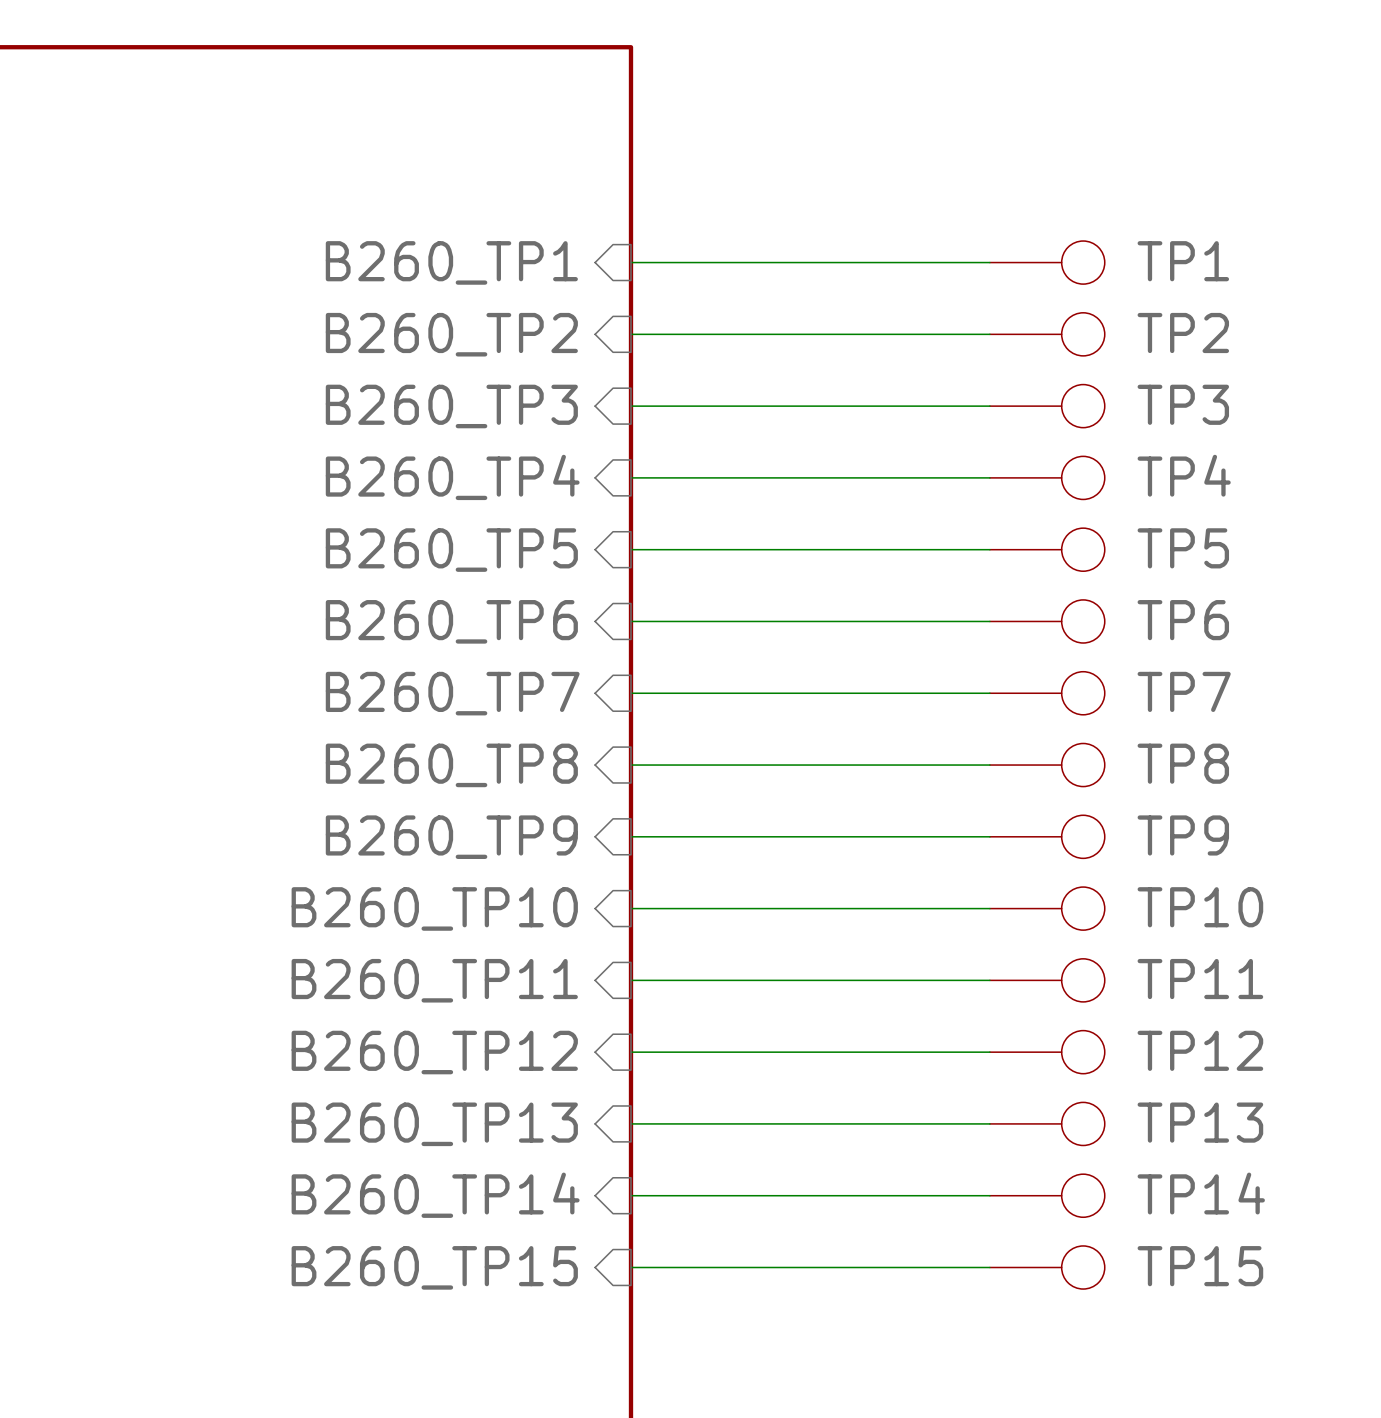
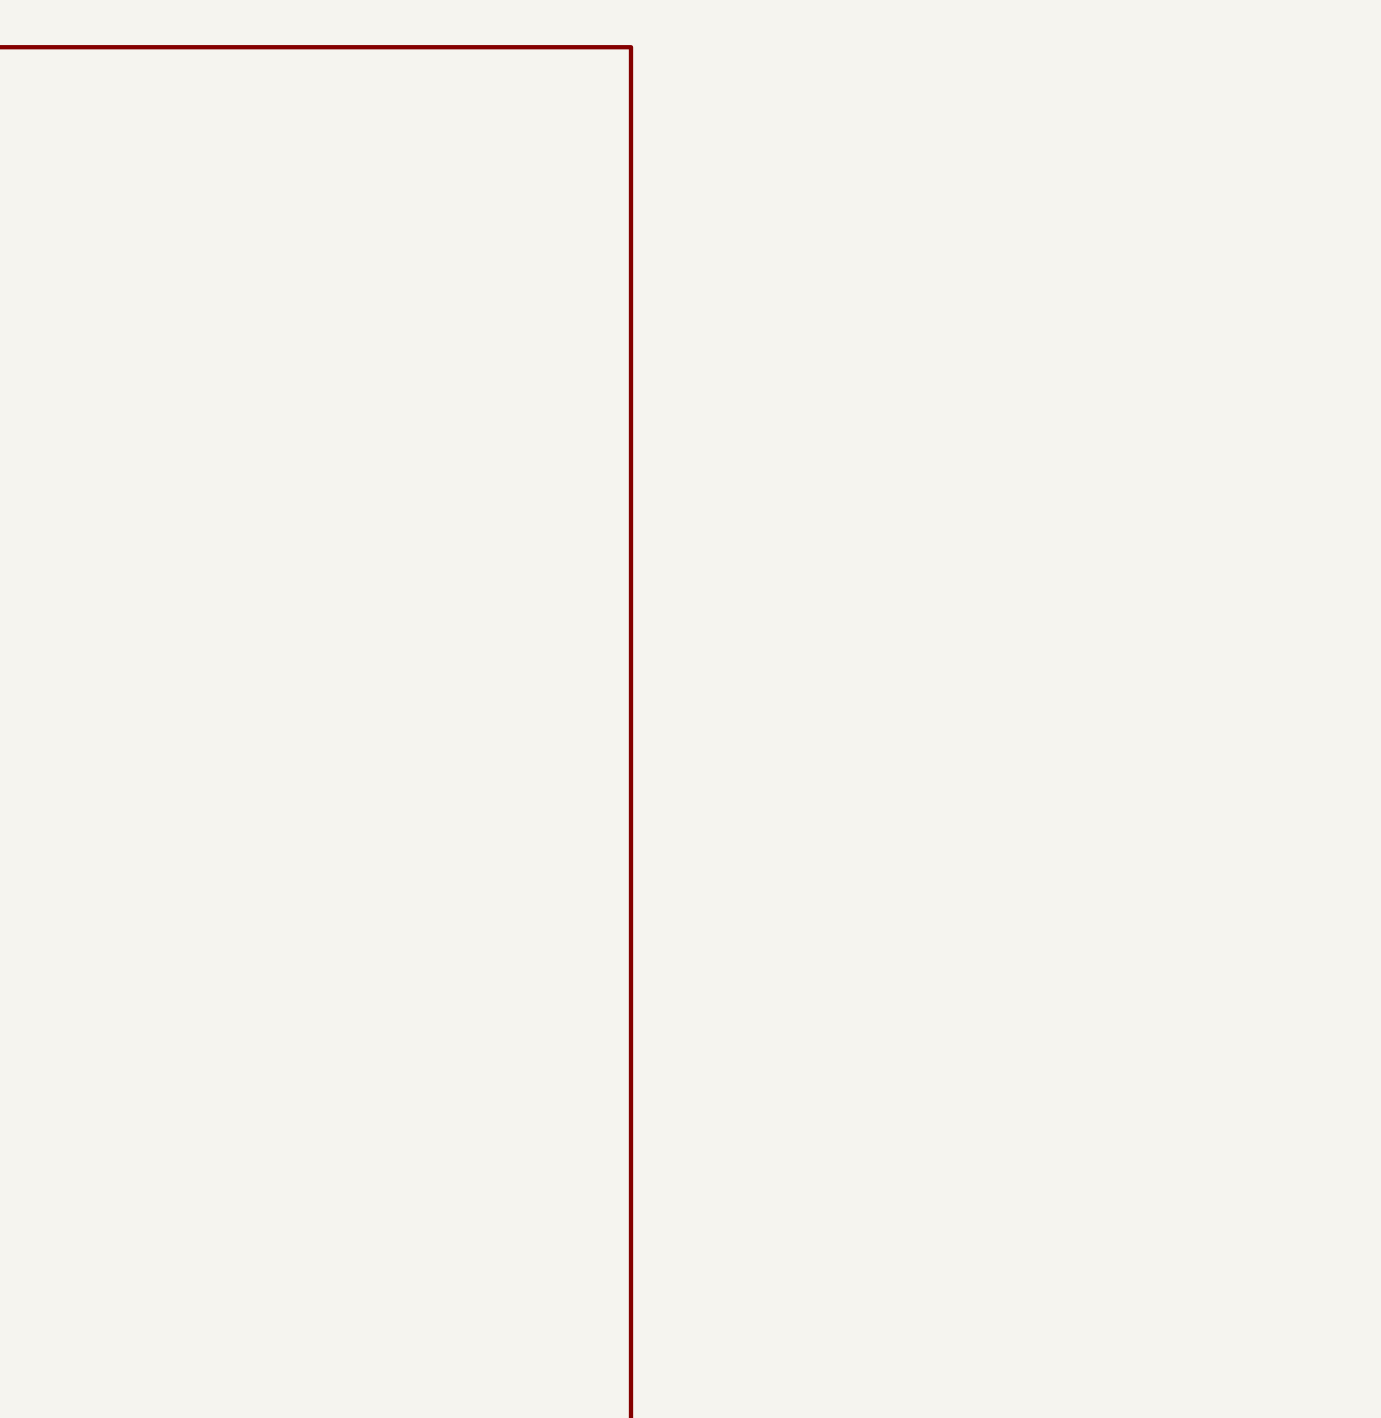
sheet pin: B260_TP1 (451, 262) -> none
wire: (630, 262) (989, 262) -> none
TP1: (1047, 262) -> none
sheet pin: B260_TP2 (451, 334) -> none
wire: (630, 334) (989, 334) -> none
TP2: (1047, 334) -> none
sheet pin: B260_TP3 (451, 406) -> none
wire: (630, 406) (989, 406) -> none
TP3: (1047, 406) -> none
sheet pin: B260_TP4 (452, 477) -> none
wire: (630, 477) (989, 477) -> none
TP4: (1047, 477) -> none
wire: (630, 549) (989, 549) -> none
TP5: (1047, 549) -> none
sheet pin: B260_TP5 (451, 550) -> none
sheet pin: B260_TP6 (451, 621) -> none
wire: (630, 621) (989, 621) -> none
TP6: (1047, 621) -> none
sheet pin: B260_TP7 (452, 693) -> none
wire: (630, 693) (989, 693) -> none
TP7: (1047, 693) -> none
sheet pin: B260_TP8 (451, 765) -> none
wire: (630, 765) (989, 765) -> none
TP8: (1047, 765) -> none
wire: (630, 836) (989, 836) -> none
TP9: (1047, 836) -> none
sheet pin: B260_TP9 (451, 837) -> none
sheet pin: B260_TP10 (434, 908) -> none
wire: (630, 908) (989, 908) -> none
TP10: (1047, 908) -> none
sheet pin: B260_TP11 (434, 980) -> none
wire: (630, 980) (989, 980) -> none
TP11: (1047, 980) -> none
sheet pin: B260_TP12 (434, 1052) -> none
wire: (630, 1052) (989, 1052) -> none
TP12: (1047, 1052) -> none
wire: (630, 1123) (989, 1123) -> none
TP13: (1047, 1123) -> none
sheet pin: B260_TP13 (434, 1124) -> none
sheet pin: B260_TP14 (435, 1195) -> none
wire: (630, 1195) (989, 1195) -> none
TP14: (1047, 1195) -> none
sheet pin: B260_TP15 (434, 1267) -> none
wire: (630, 1267) (989, 1267) -> none
TP15: (1047, 1267) -> none

